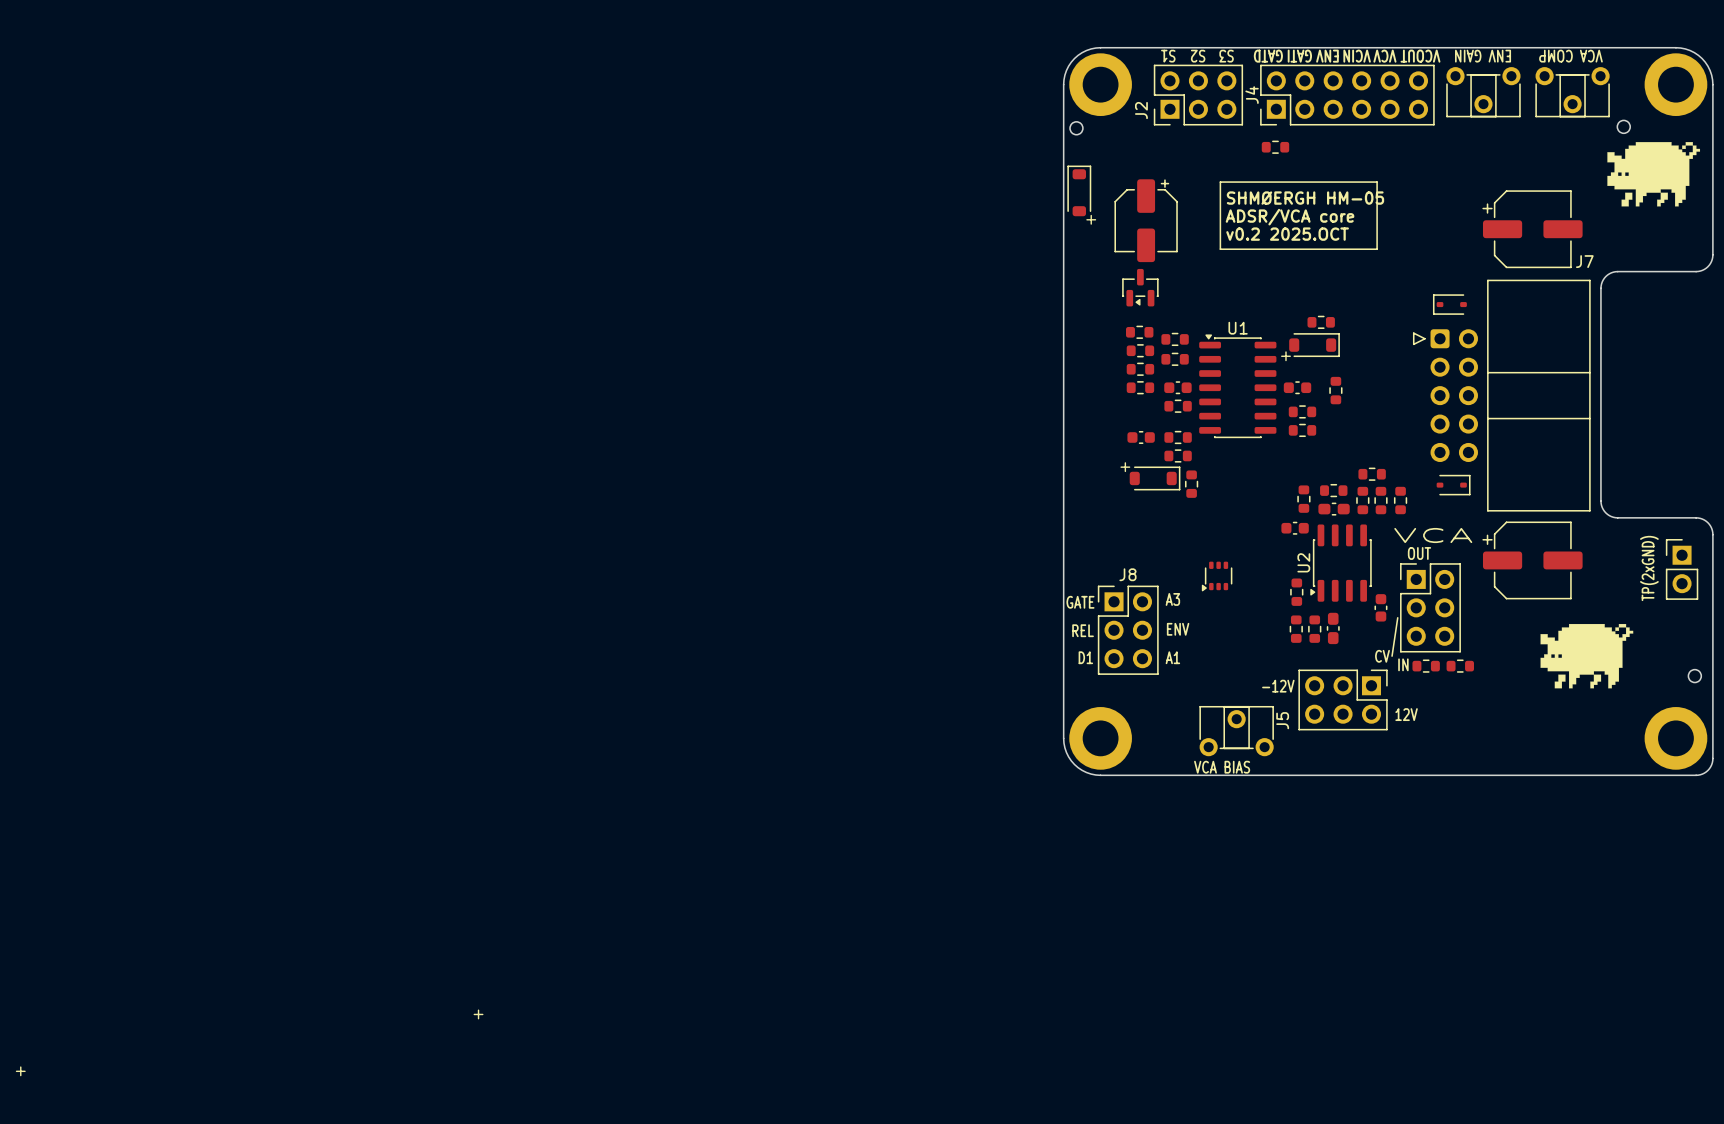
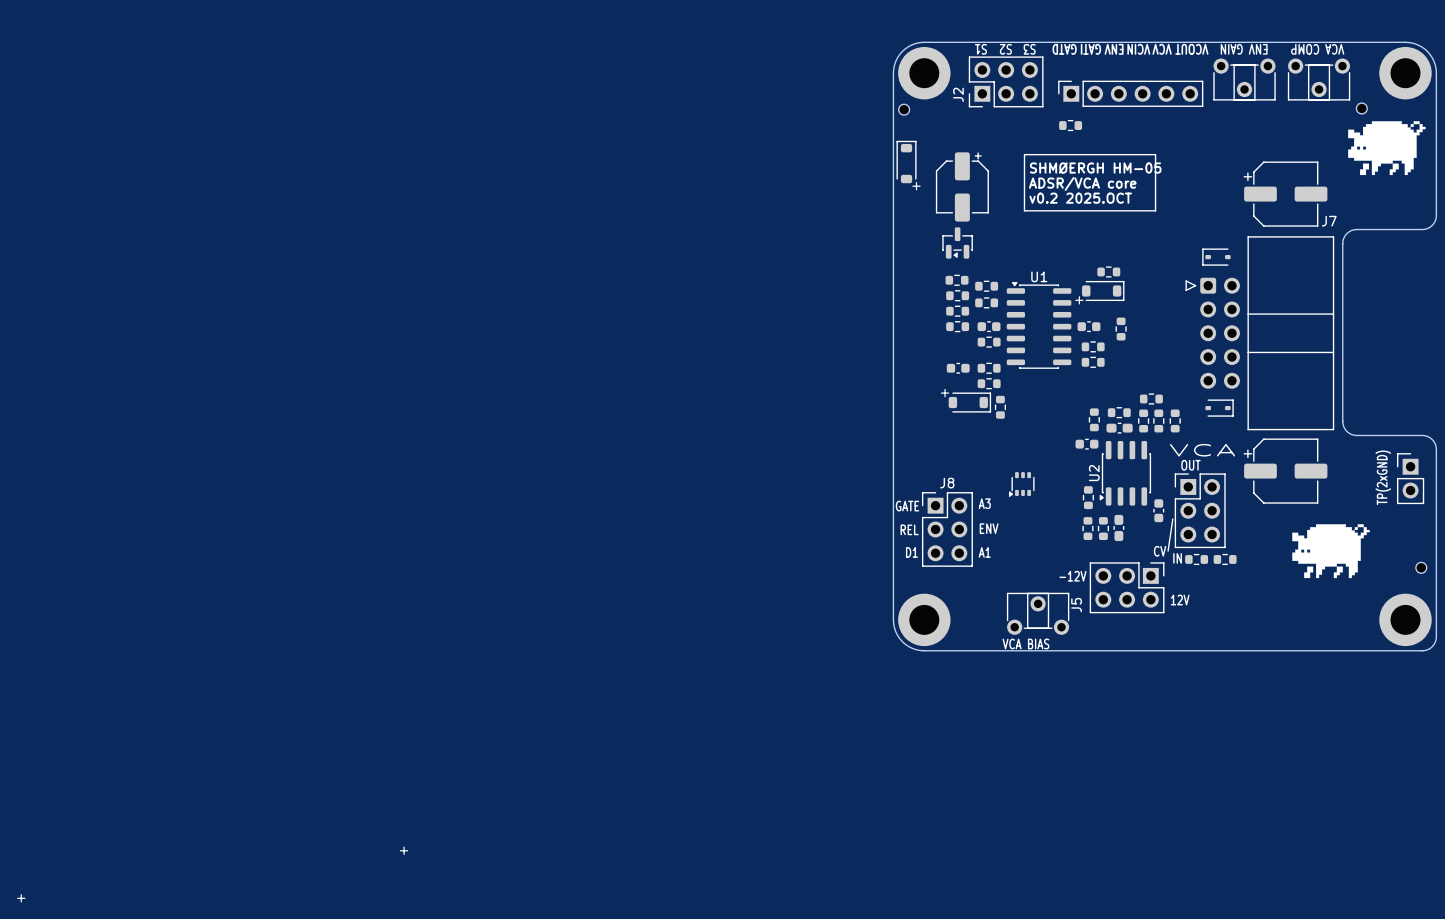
J4: (1347, 95) -> none
part: none -> (1130, 93)

